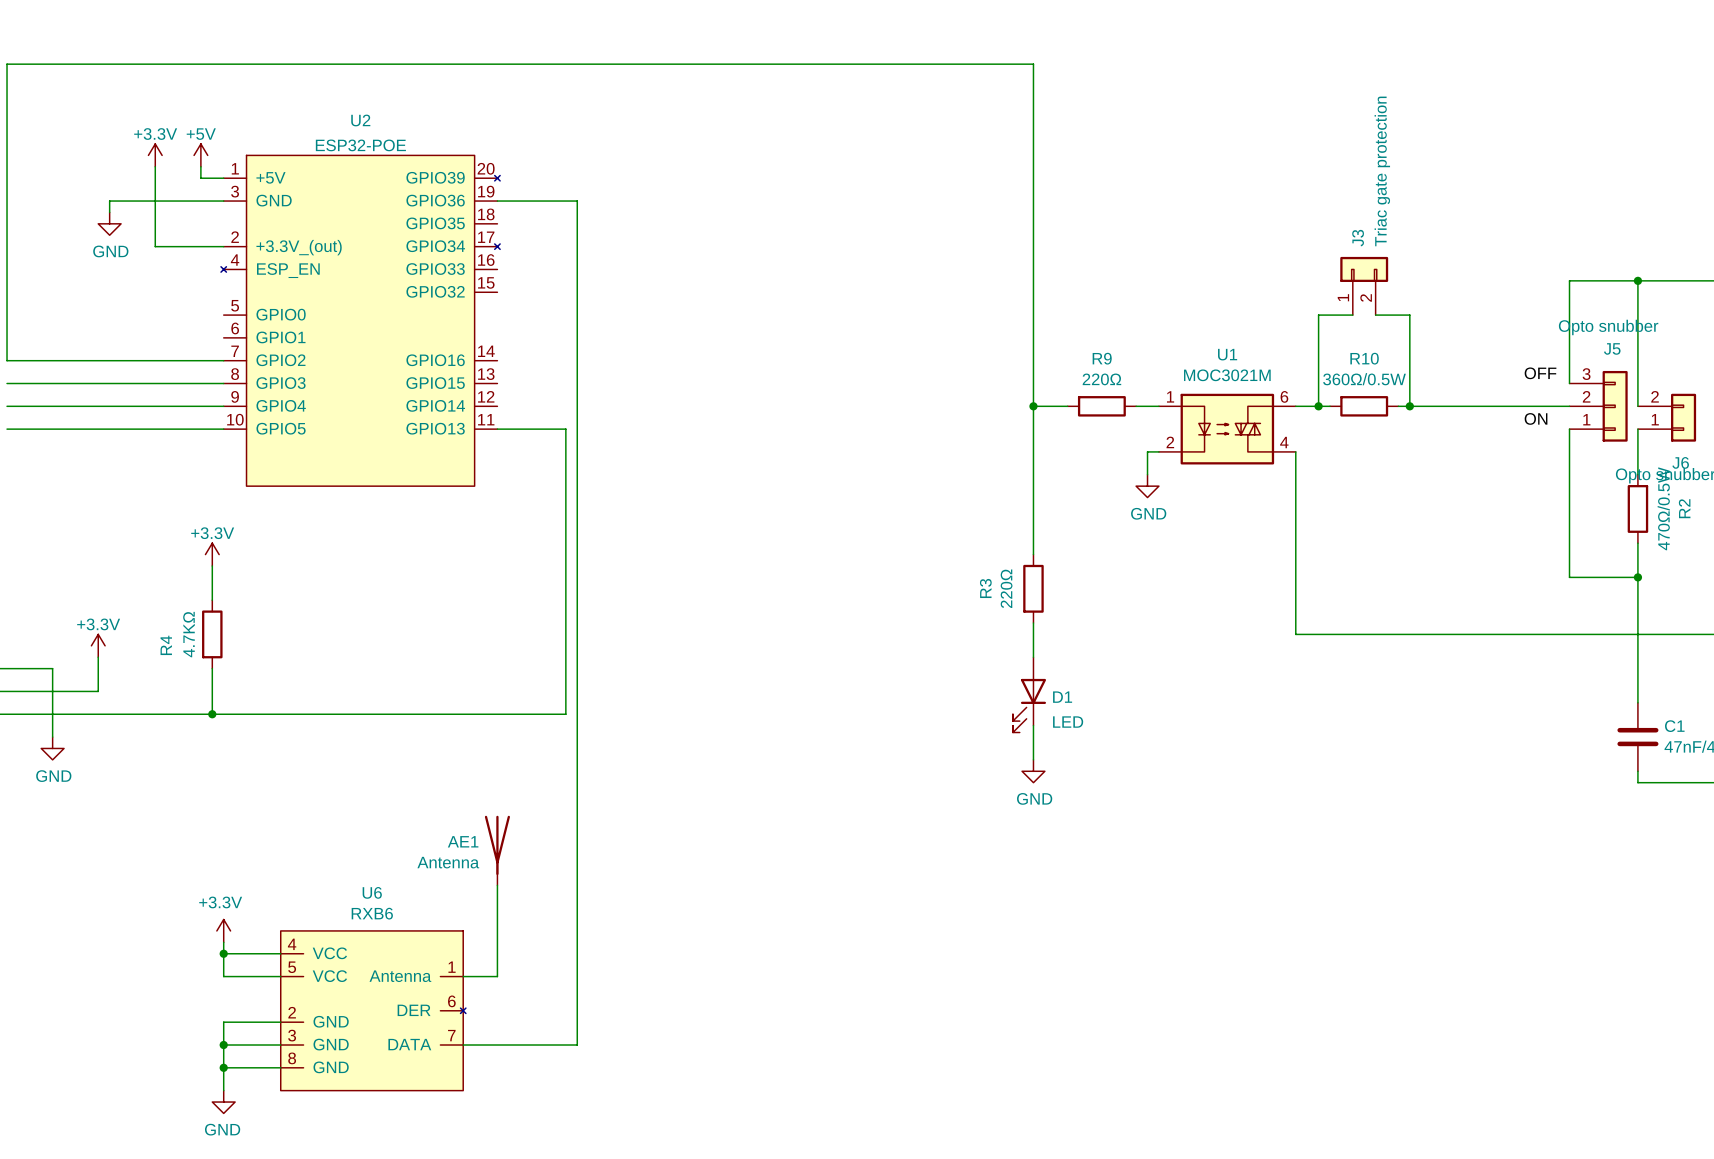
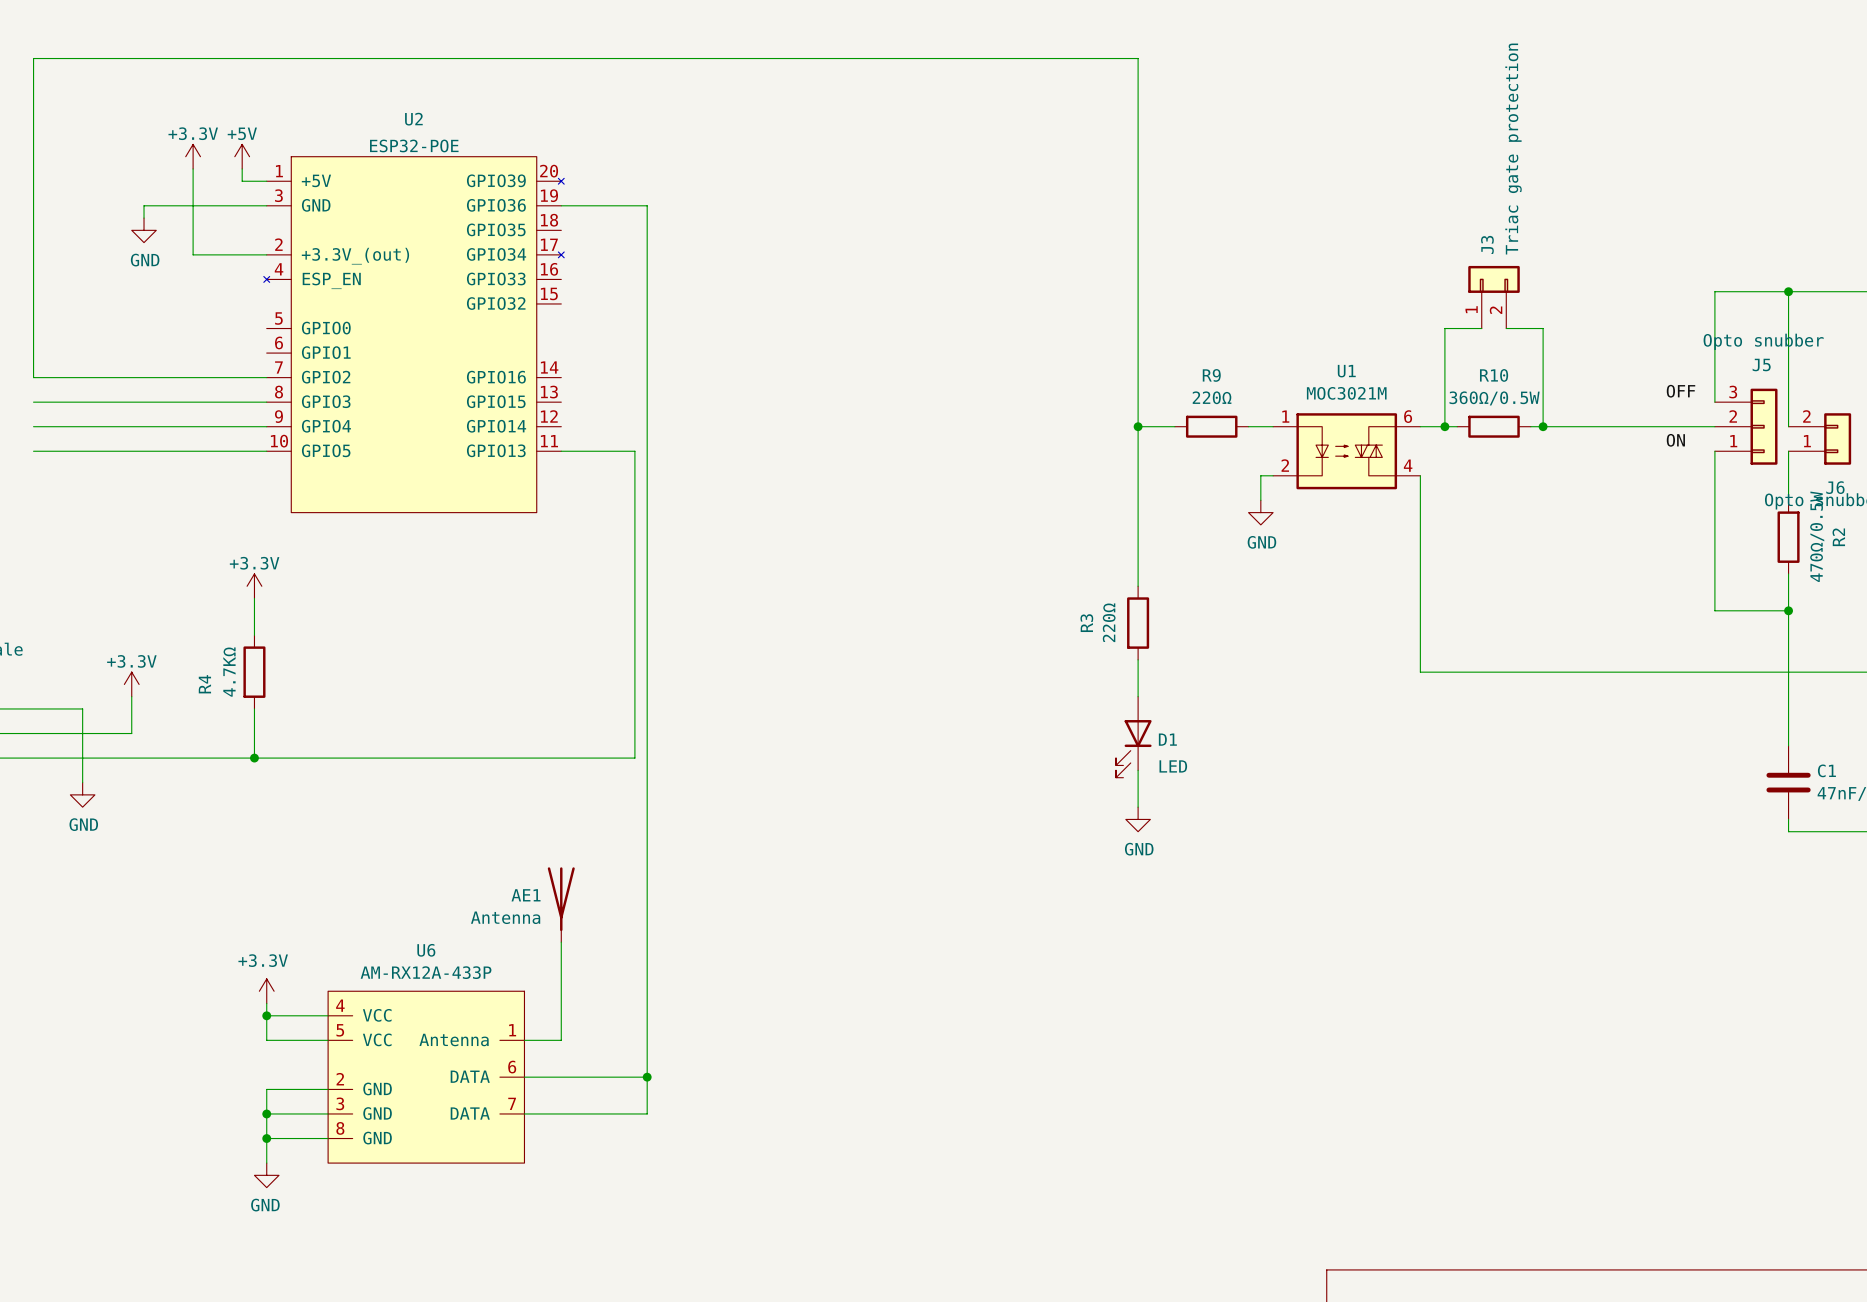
U6 value: RXB6 (372, 913) -> AM-RX12A-433P (426, 972)
U6 symbol: [280, 930, 466, 1091] -> [328, 991, 525, 1164]
wire: none -> (524, 1077) (647, 1077)
junction: none -> (647, 1077)

